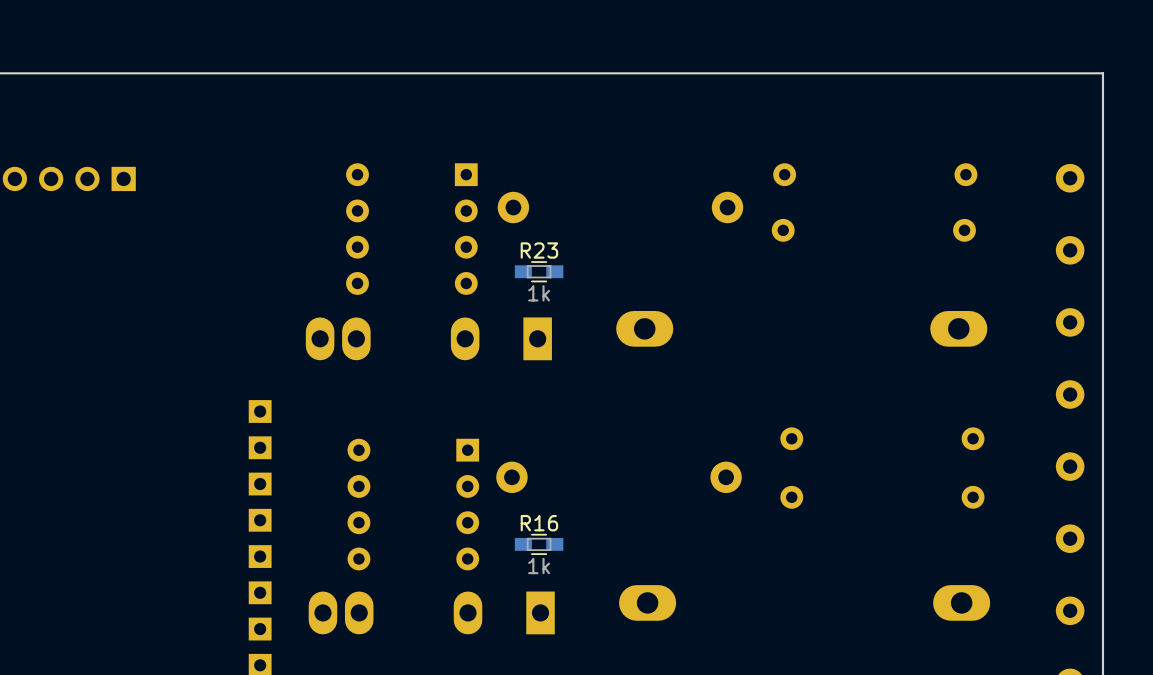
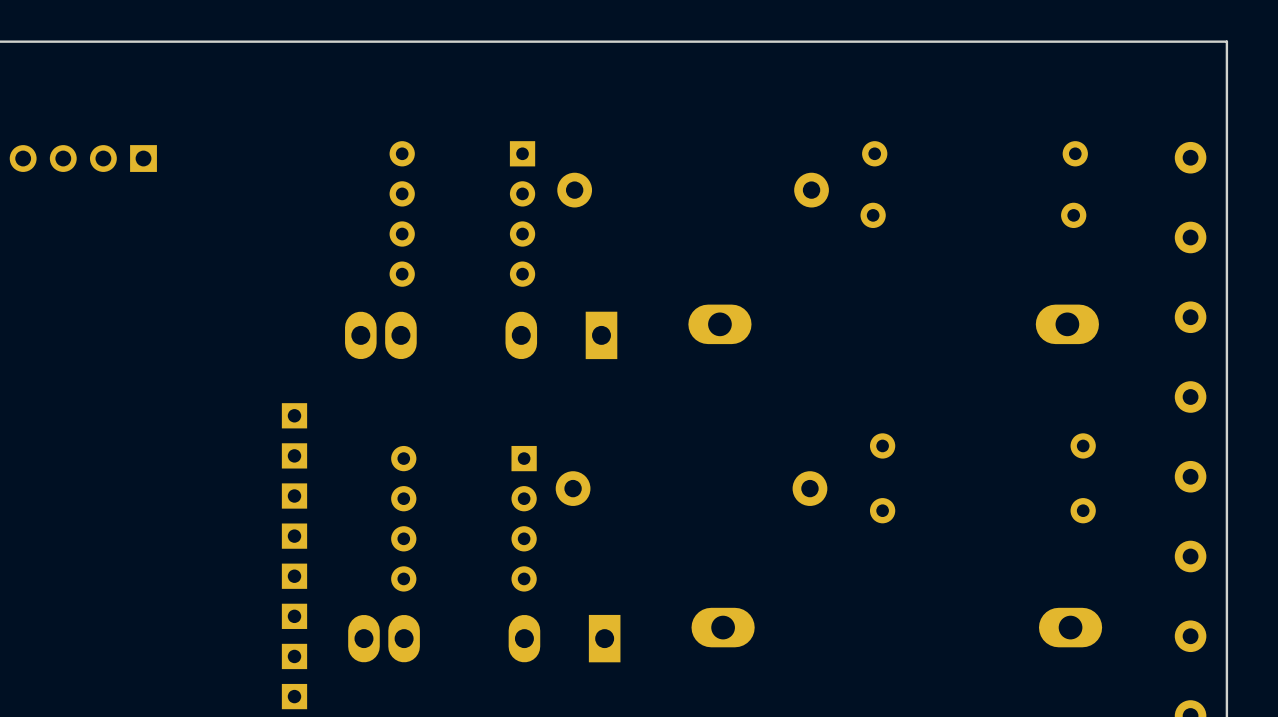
R23: 1k (539, 271) -> none
R16: 1k (539, 544) -> none

